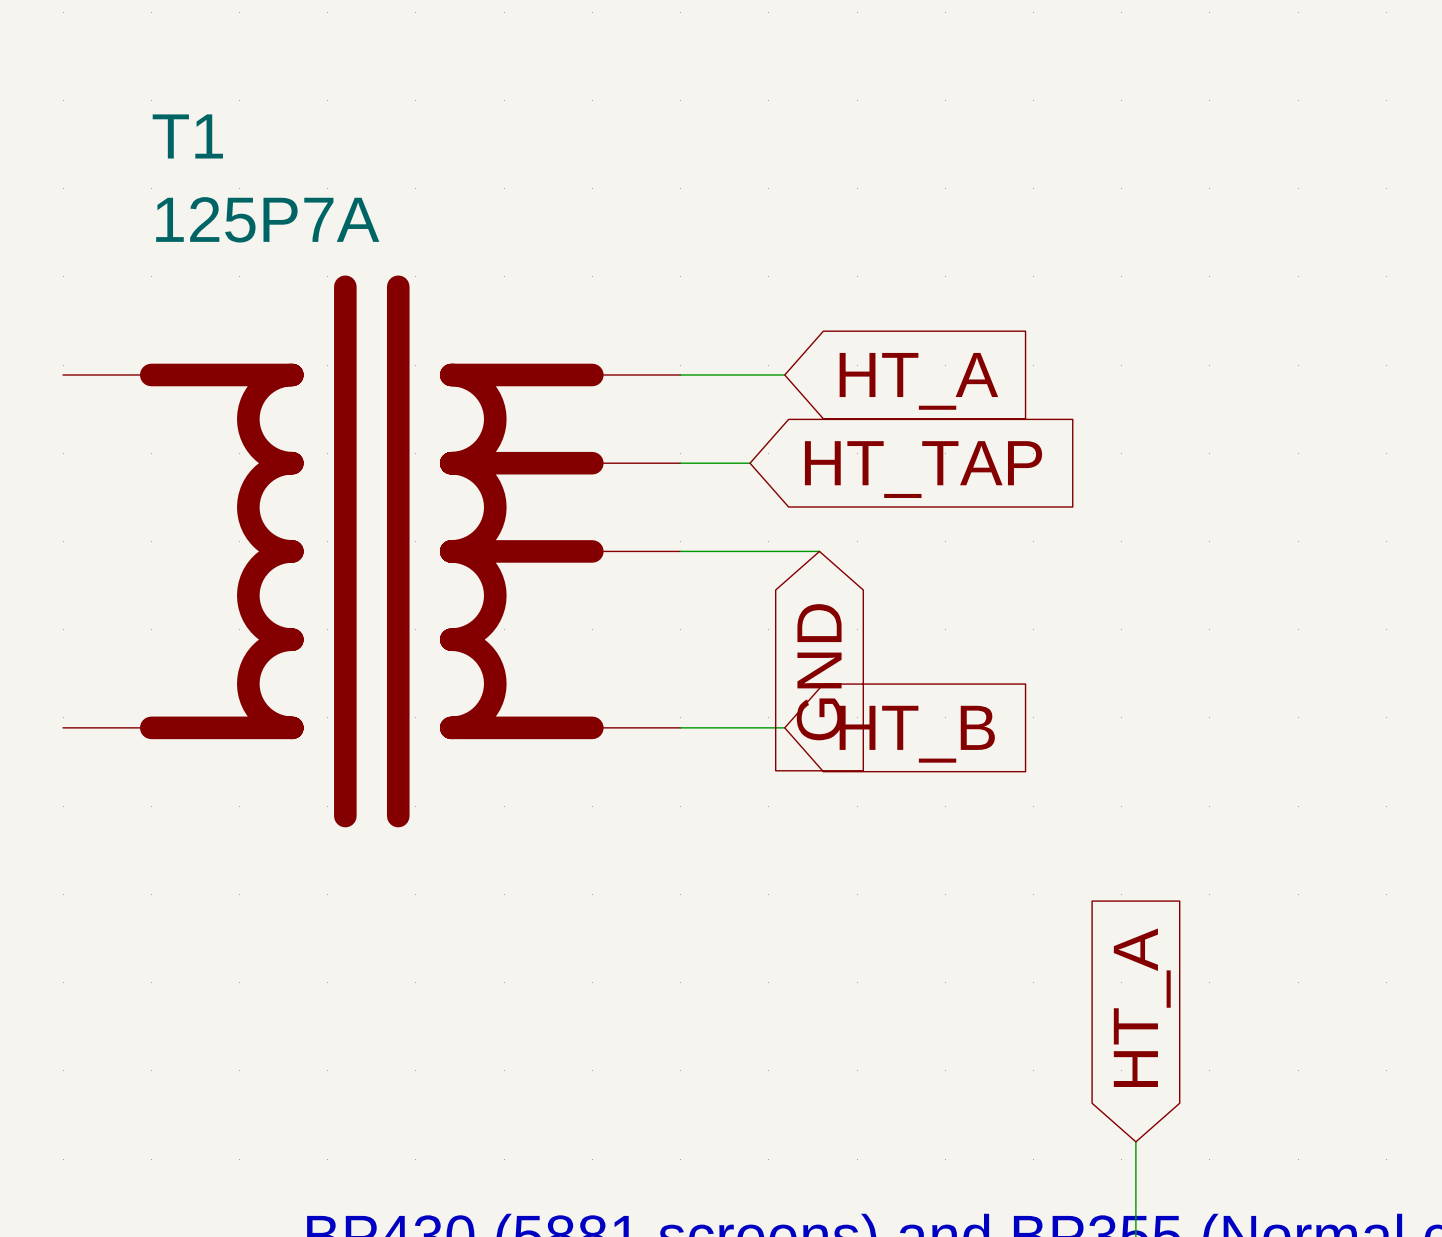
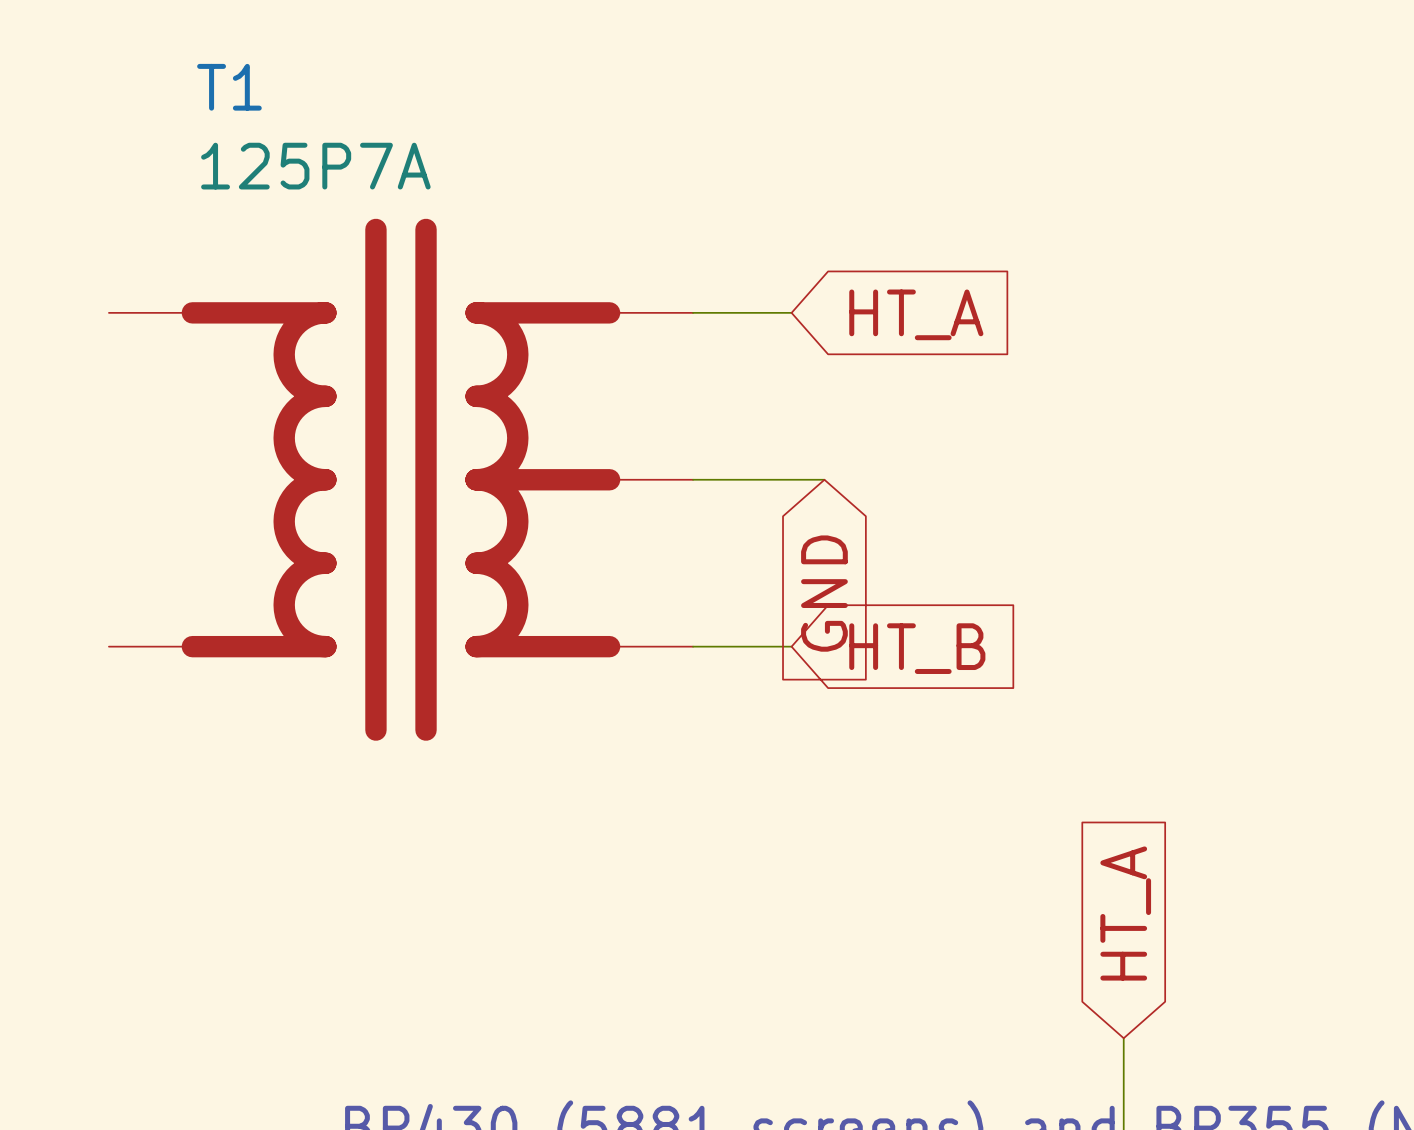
T1 symbol: [63, 275, 681, 828] -> [108, 218, 694, 741]
wire: (680, 463) (750, 463) -> none
global label: HT_TAP (923, 469) -> none

